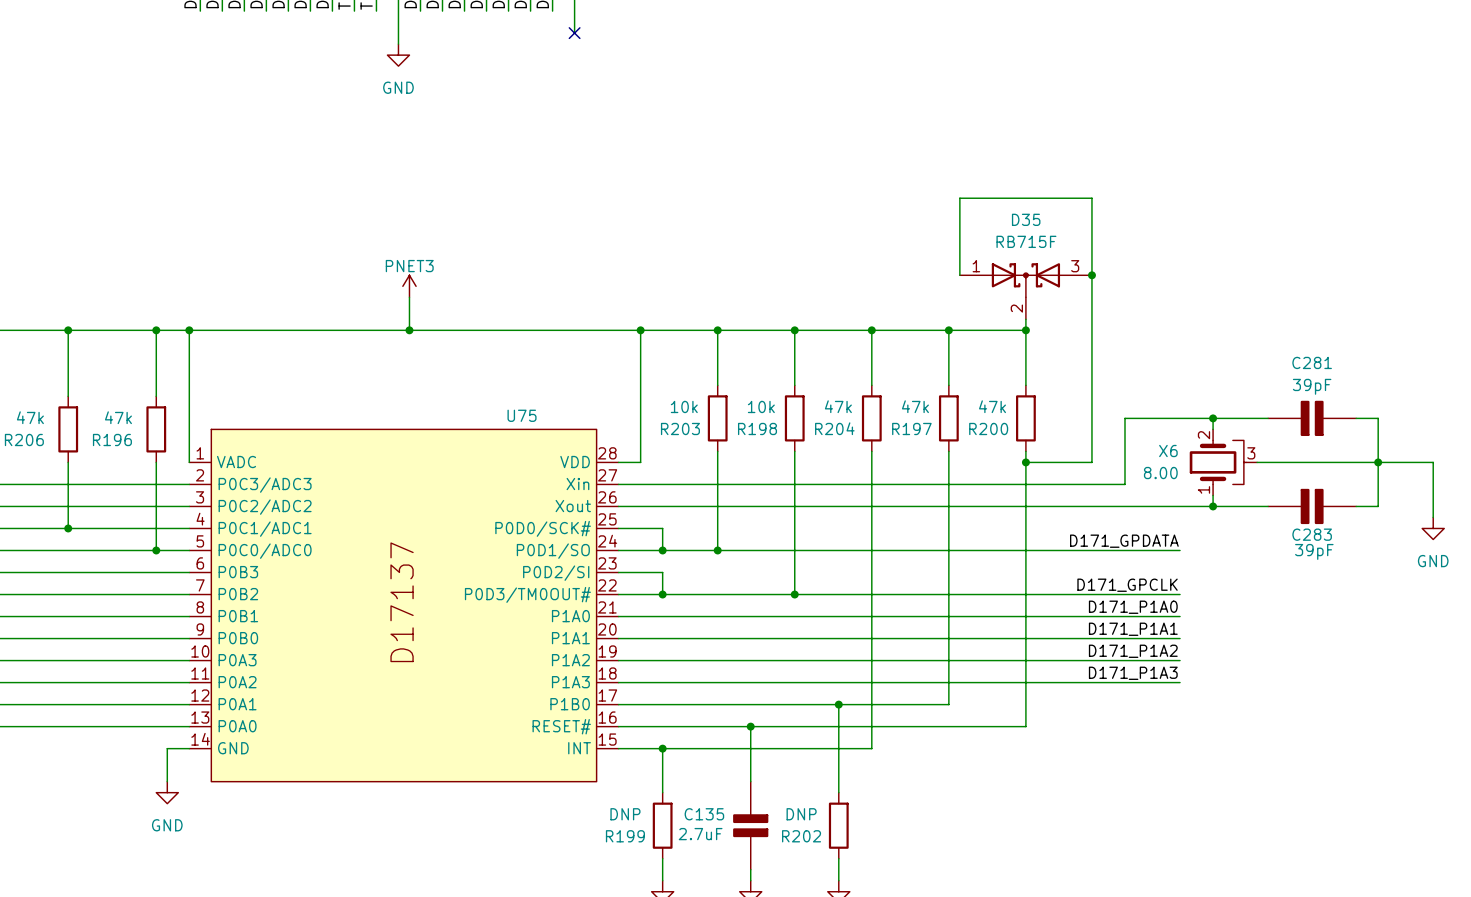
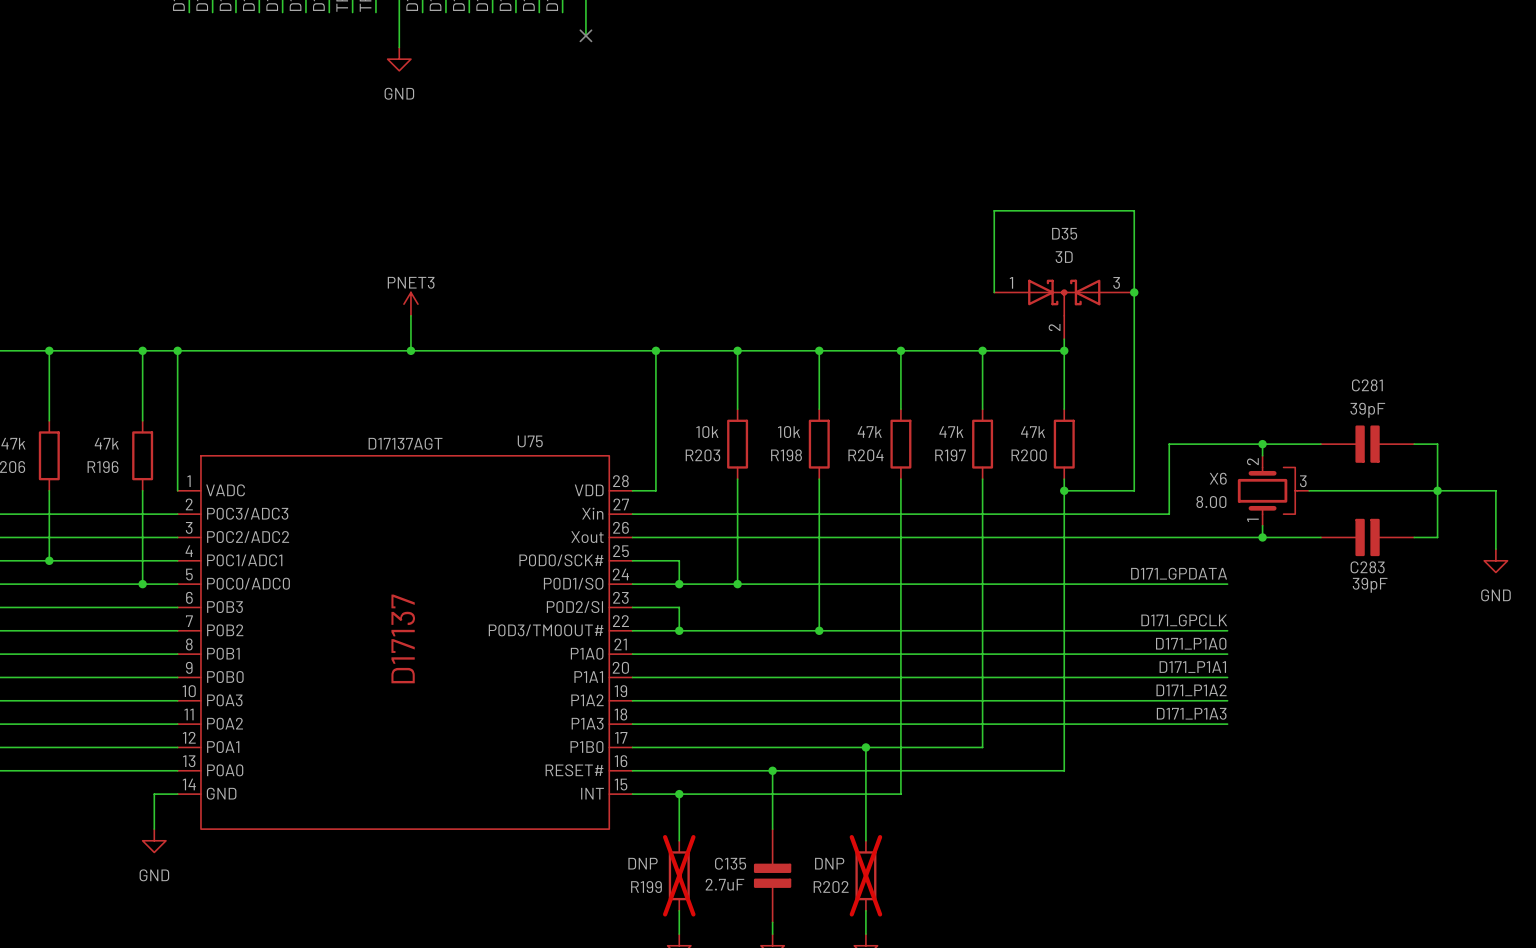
D35 value: RB715F (1026, 241) -> 3D (1064, 257)
U75 value: none -> D17137AGT (405, 443)
R199 do-not-place cross: none -> (679, 875)
R202 do-not-place cross: none -> (865, 875)

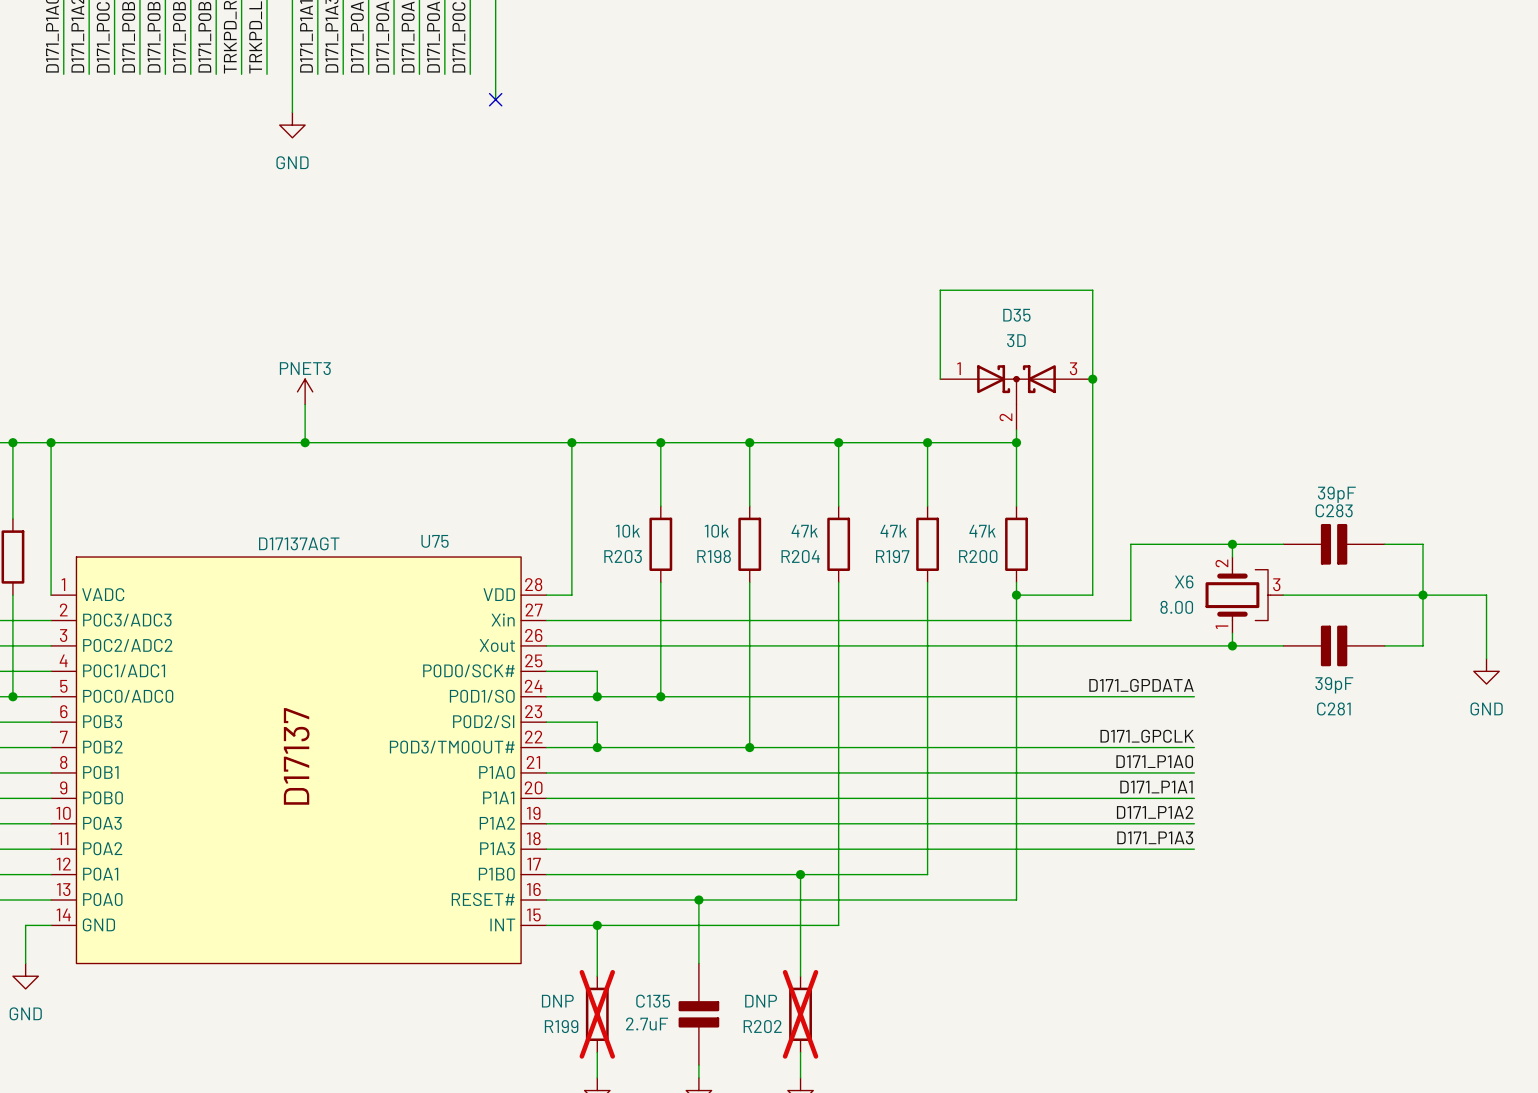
C281 name position: C281 (1367, 385) -> C281 (1333, 708)
C281 value position: 39pF (1367, 410) -> 39pF (1334, 685)
C281 position: (1367, 444) -> (1334, 645)
C283 position: (1367, 537) -> (1334, 544)
C283 name position: C283 (1367, 567) -> C283 (1334, 510)
C283 value position: 39pF (1370, 585) -> 39pF (1336, 494)

